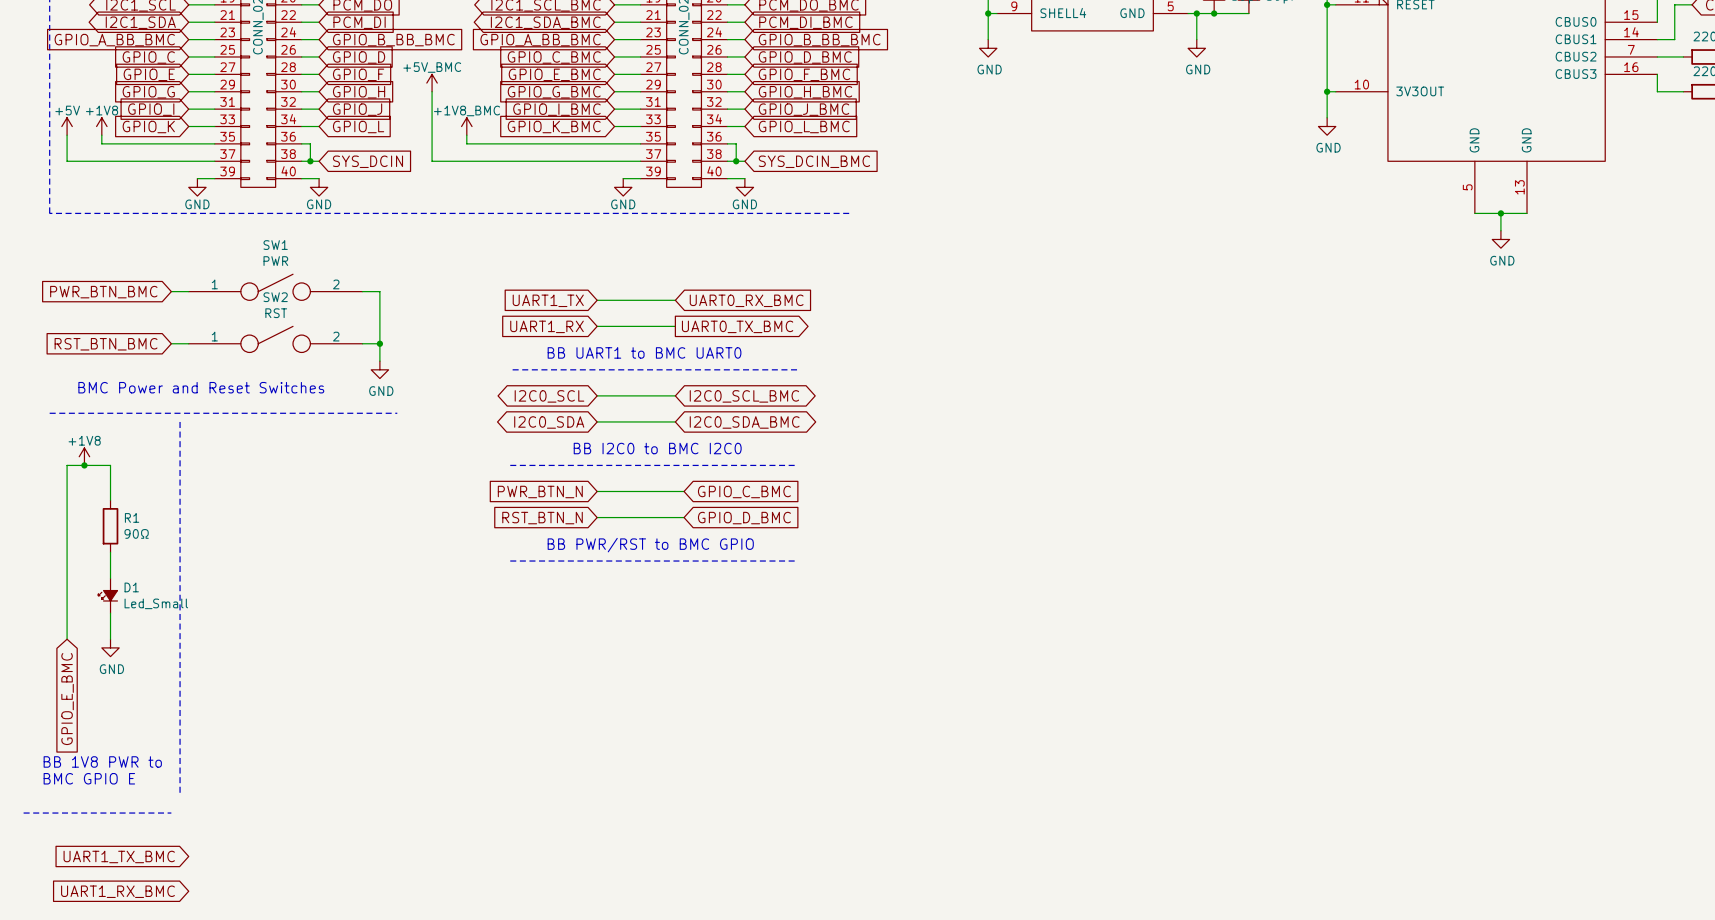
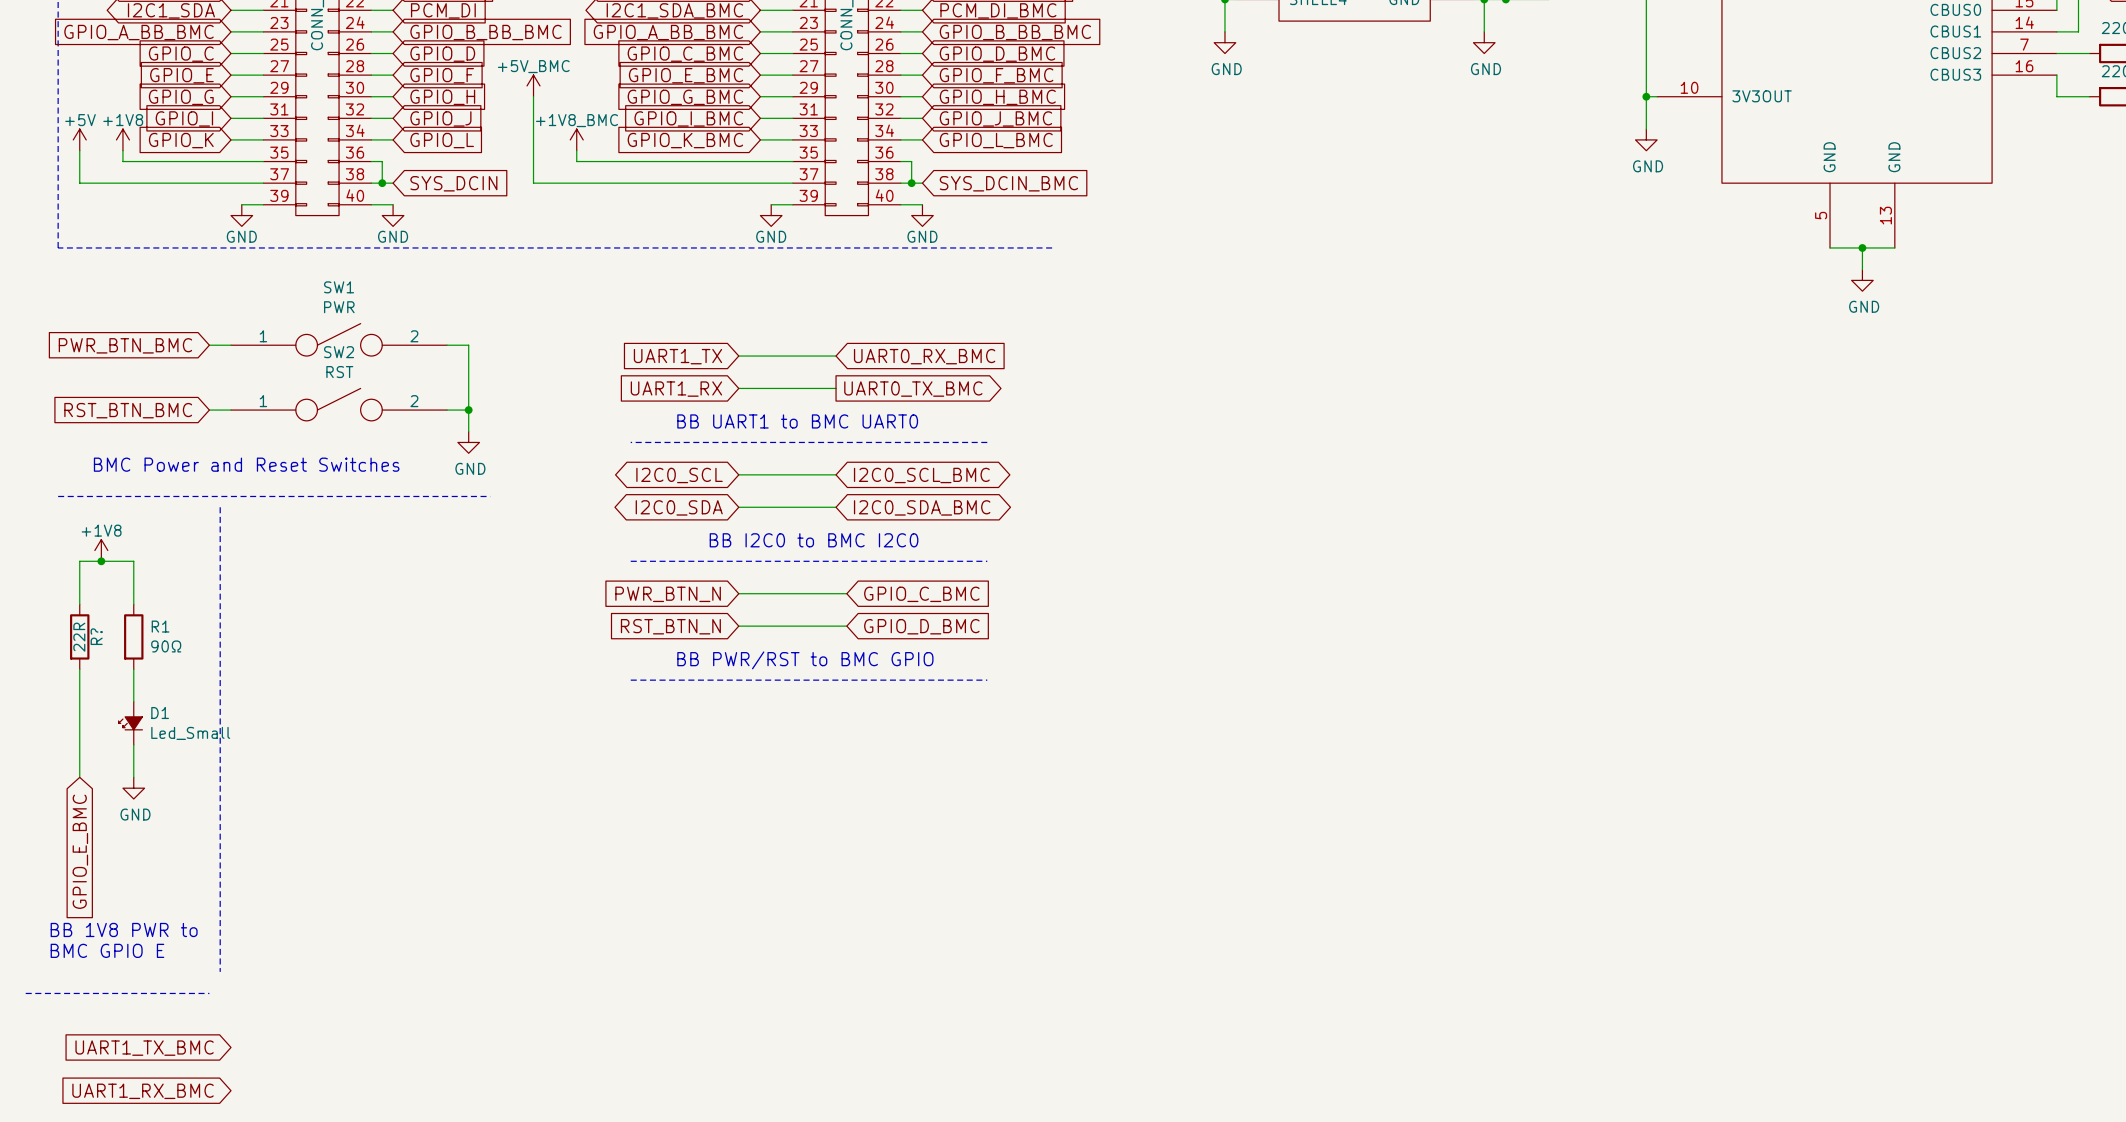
R?: none -> 22R (79, 636)

